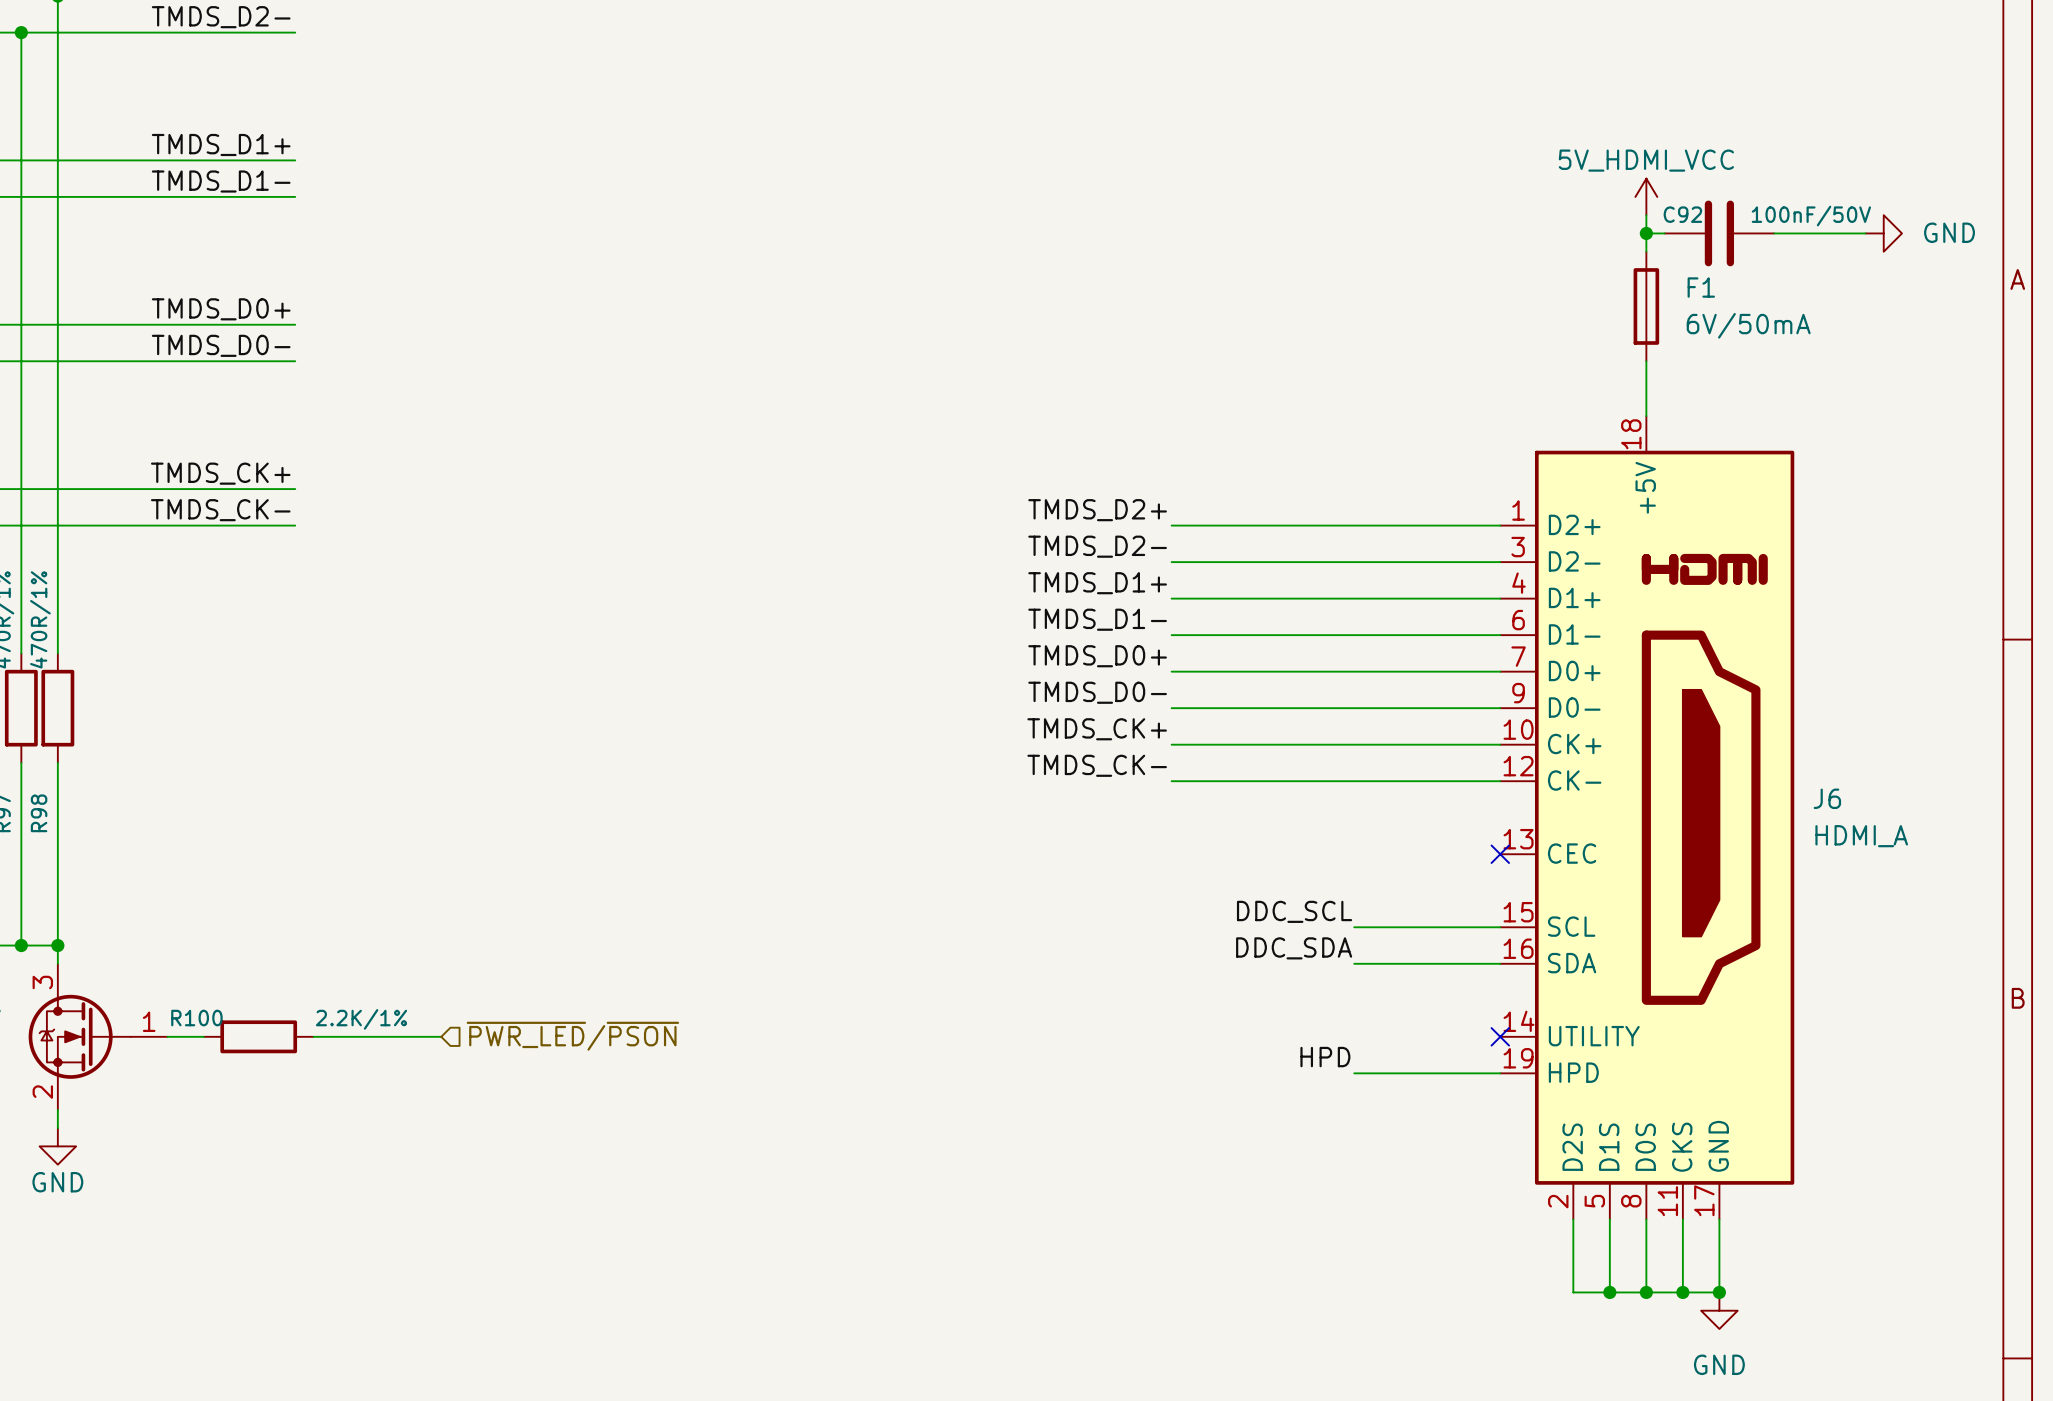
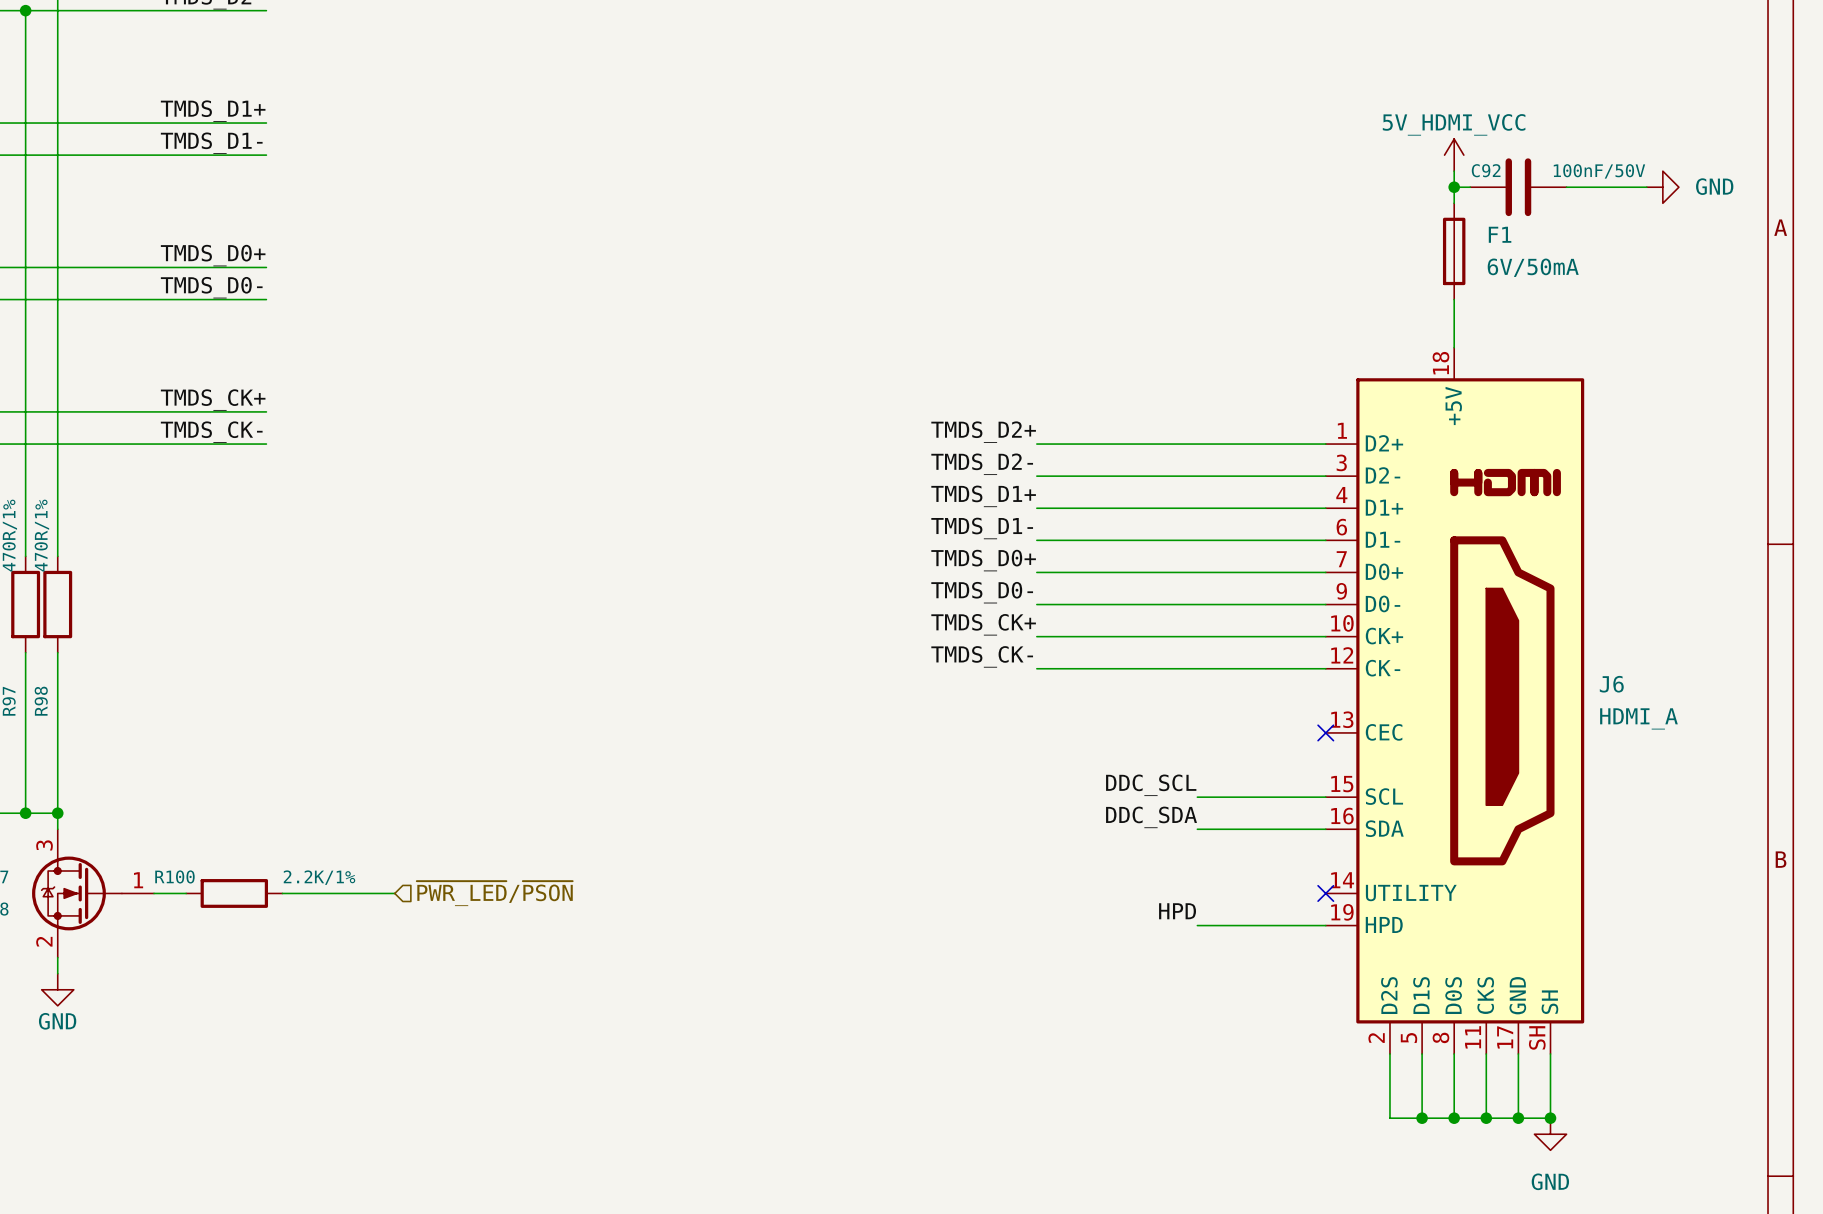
J6 symbol: [1500, 416, 1795, 1220] -> [1325, 347, 1585, 1054]
wire: none -> (1550, 1053) (1550, 1118) (1518, 1118)
junction: none -> (1550, 1118)
power symbol position: GND (1719, 1310) -> GND (1550, 1134)

